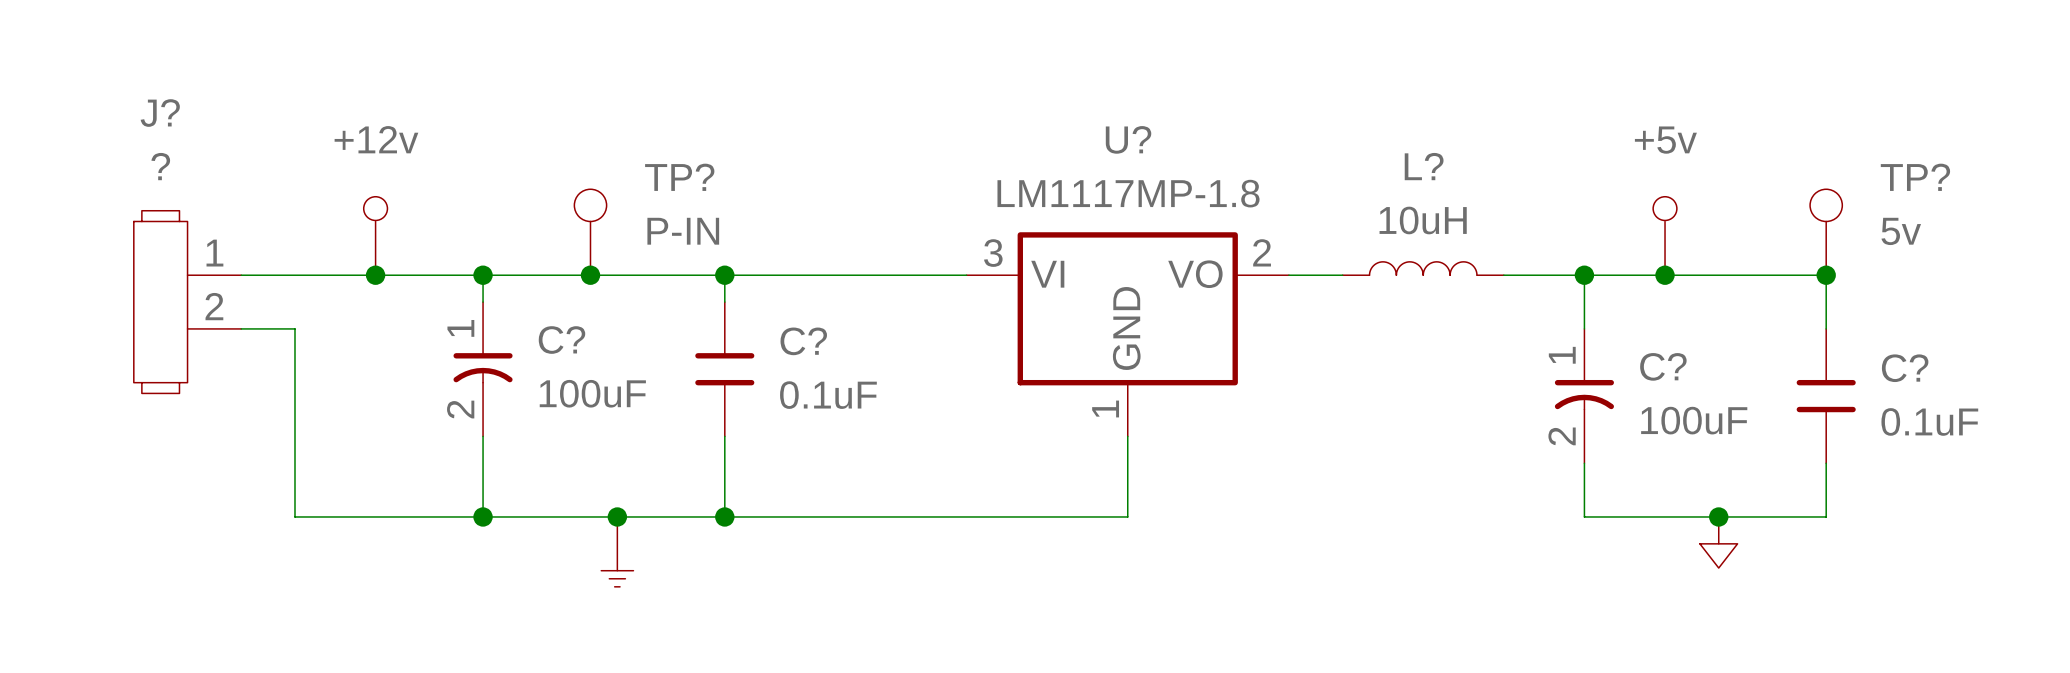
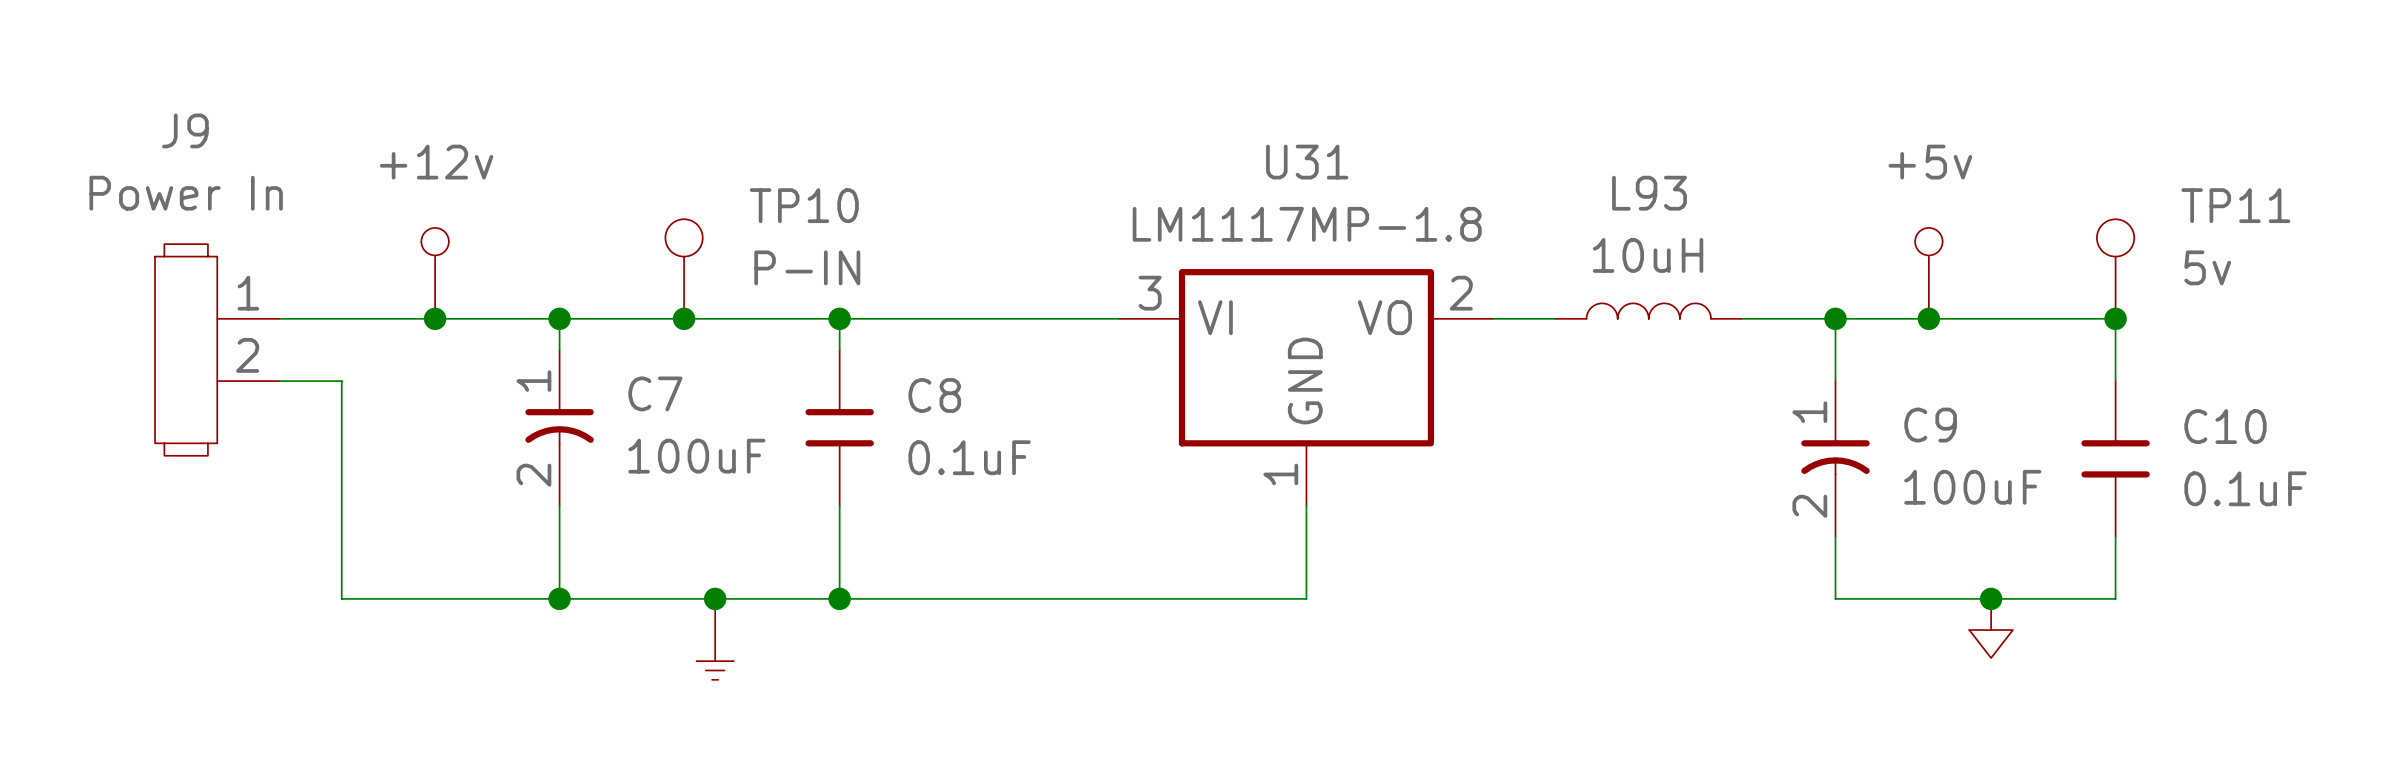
J? name: J? (160, 113) -> J9 (185, 130)
U? name: U? (1128, 139) -> U31 (1307, 162)
J? value: ? (160, 166) -> Power In (186, 193)
L? name: L? (1424, 166) -> L93 (1649, 193)
TP? name: TP? (679, 177) -> TP10 (804, 205)
TP? name: TP? (1915, 177) -> TP11 (2235, 205)
C? name: C? (561, 340) -> C7 (655, 393)
C? name: C? (803, 341) -> C8 (934, 395)
C? name: C? (1663, 366) -> C9 (1930, 425)
C? name: C? (1905, 368) -> C10 (2225, 426)

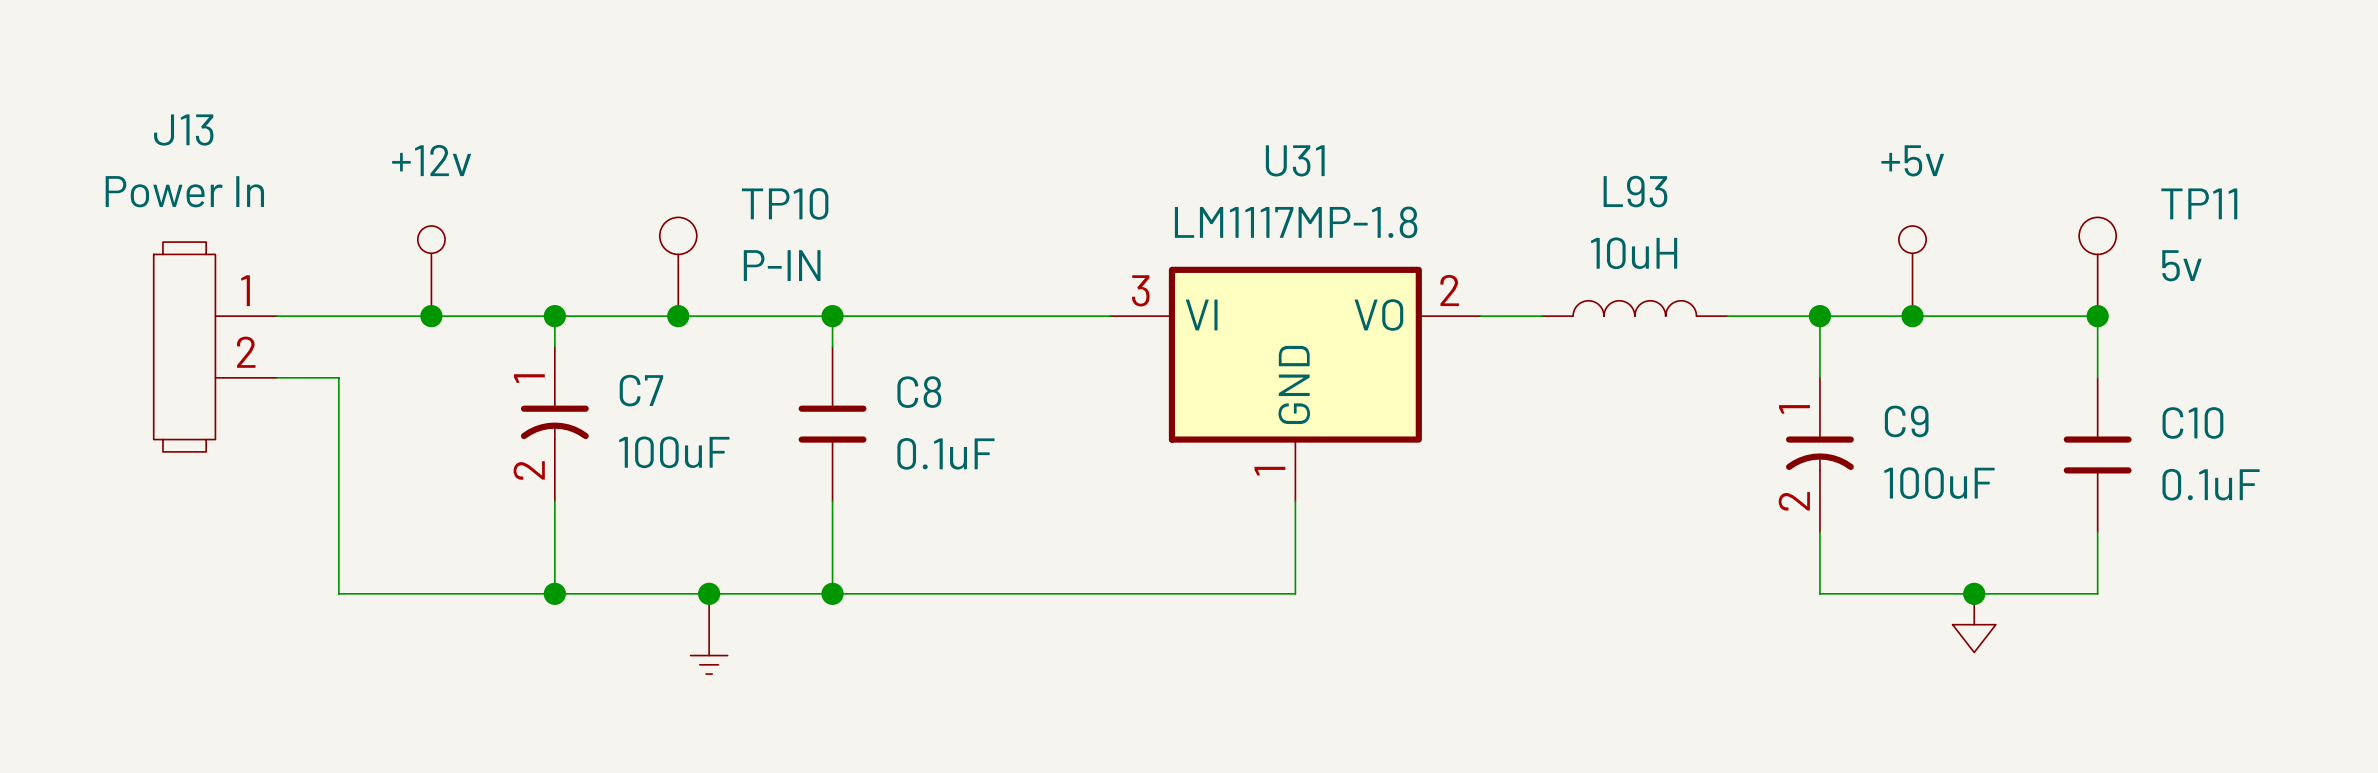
J9 name: J9 (185, 130) -> J13 (183, 130)

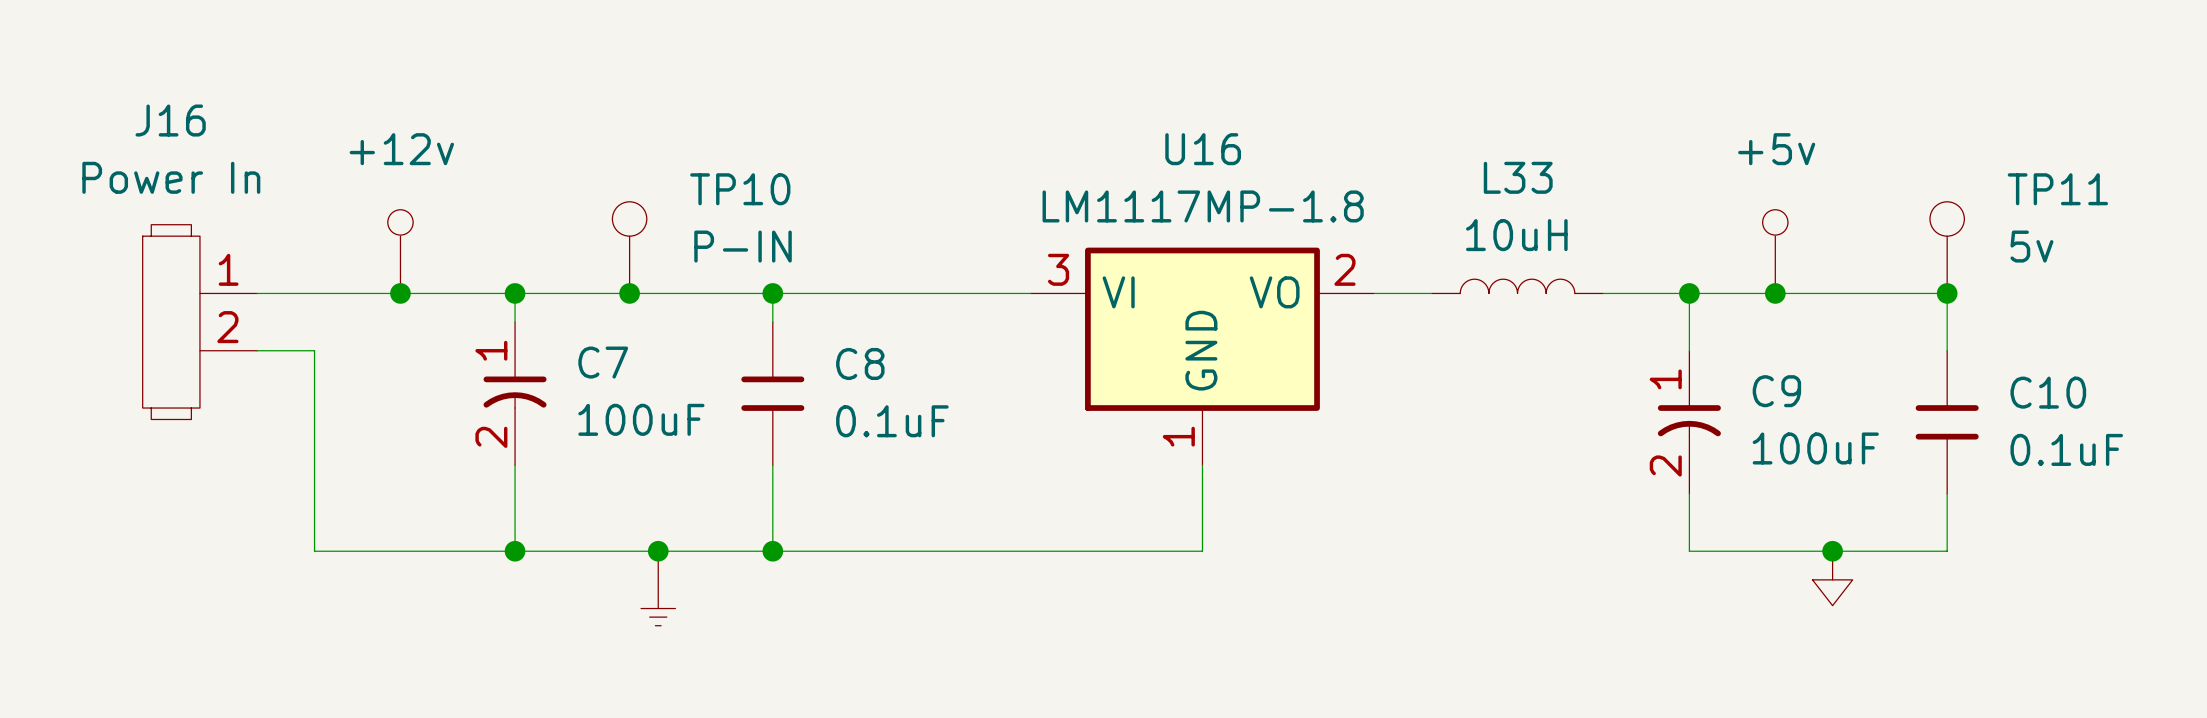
J13 name: J13 (183, 130) -> J16 (170, 120)
U31 name: U31 (1295, 160) -> U16 (1203, 149)
L93 name: L93 (1635, 191) -> L33 (1518, 177)

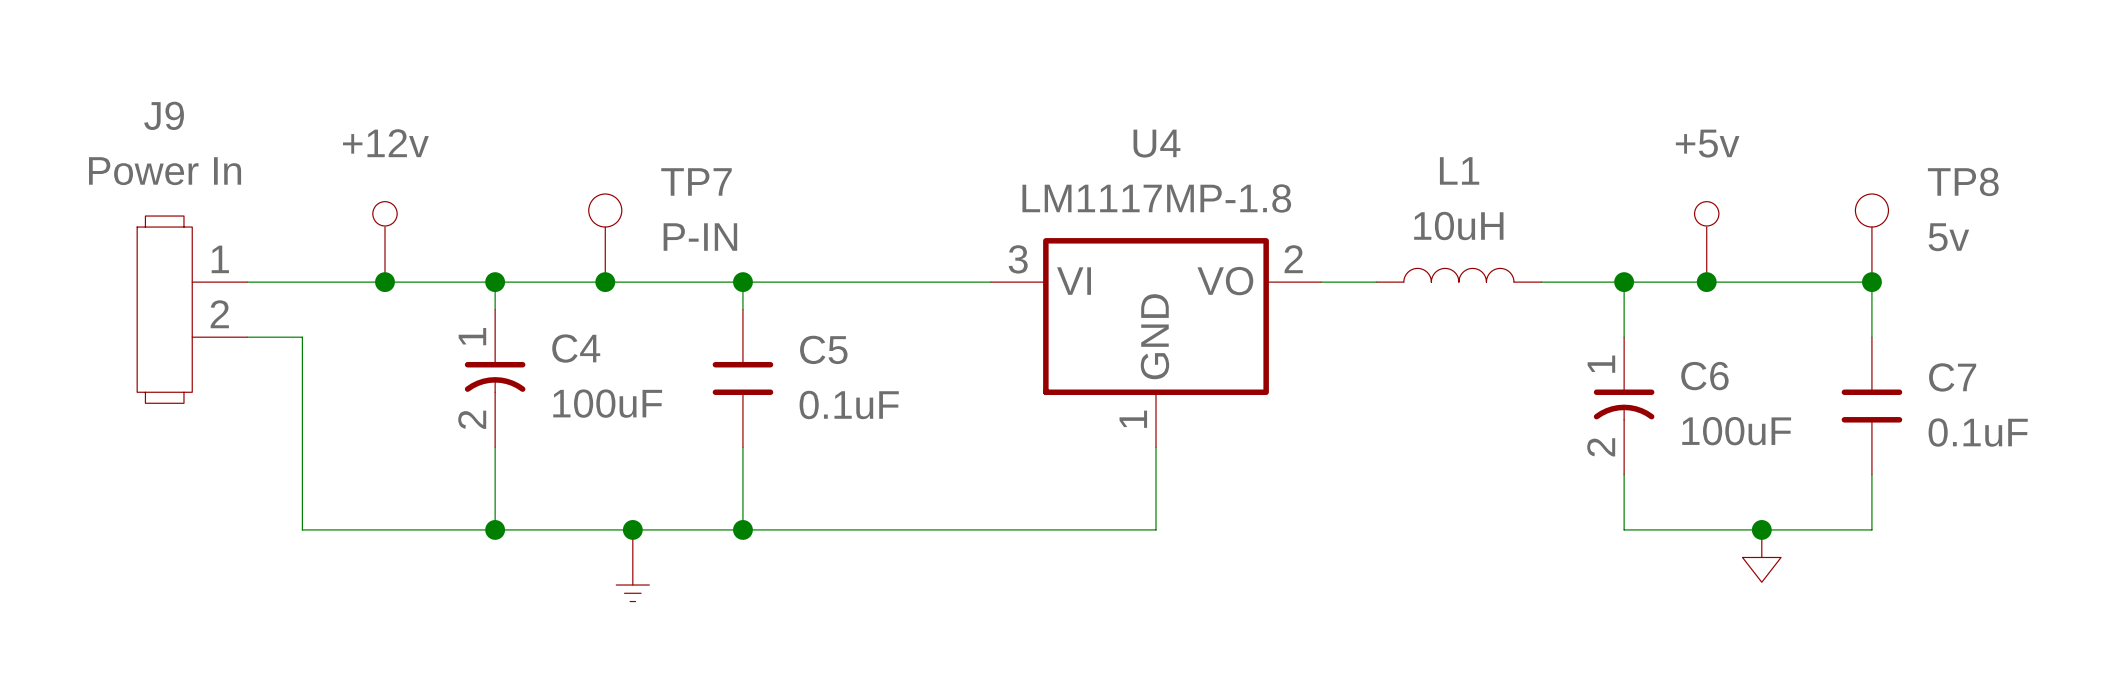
J16 name: J16 (170, 120) -> J9 (164, 115)
U16 name: U16 (1203, 149) -> U4 (1156, 143)
L33 name: L33 (1518, 177) -> L1 (1459, 170)
TP10 name: TP10 (740, 189) -> TP7 (696, 181)
TP11 name: TP11 (2057, 189) -> TP8 (1963, 181)
C7 name: C7 (603, 362) -> C4 (576, 348)
C8 name: C8 (860, 363) -> C5 (823, 349)
C9 name: C9 (1776, 391) -> C6 (1704, 376)
C10 name: C10 (2048, 392) -> C7 (1952, 377)

